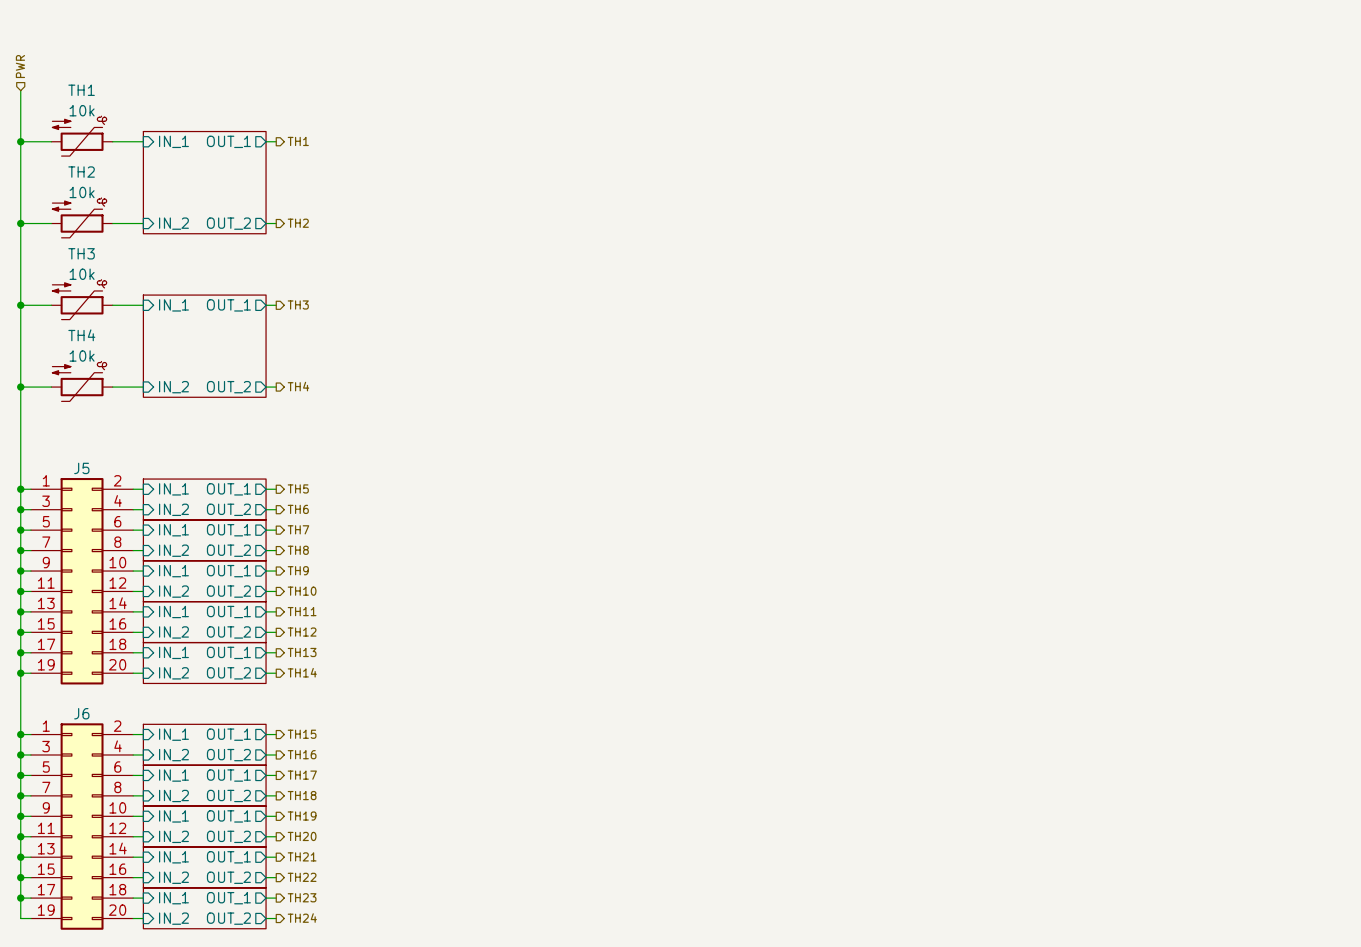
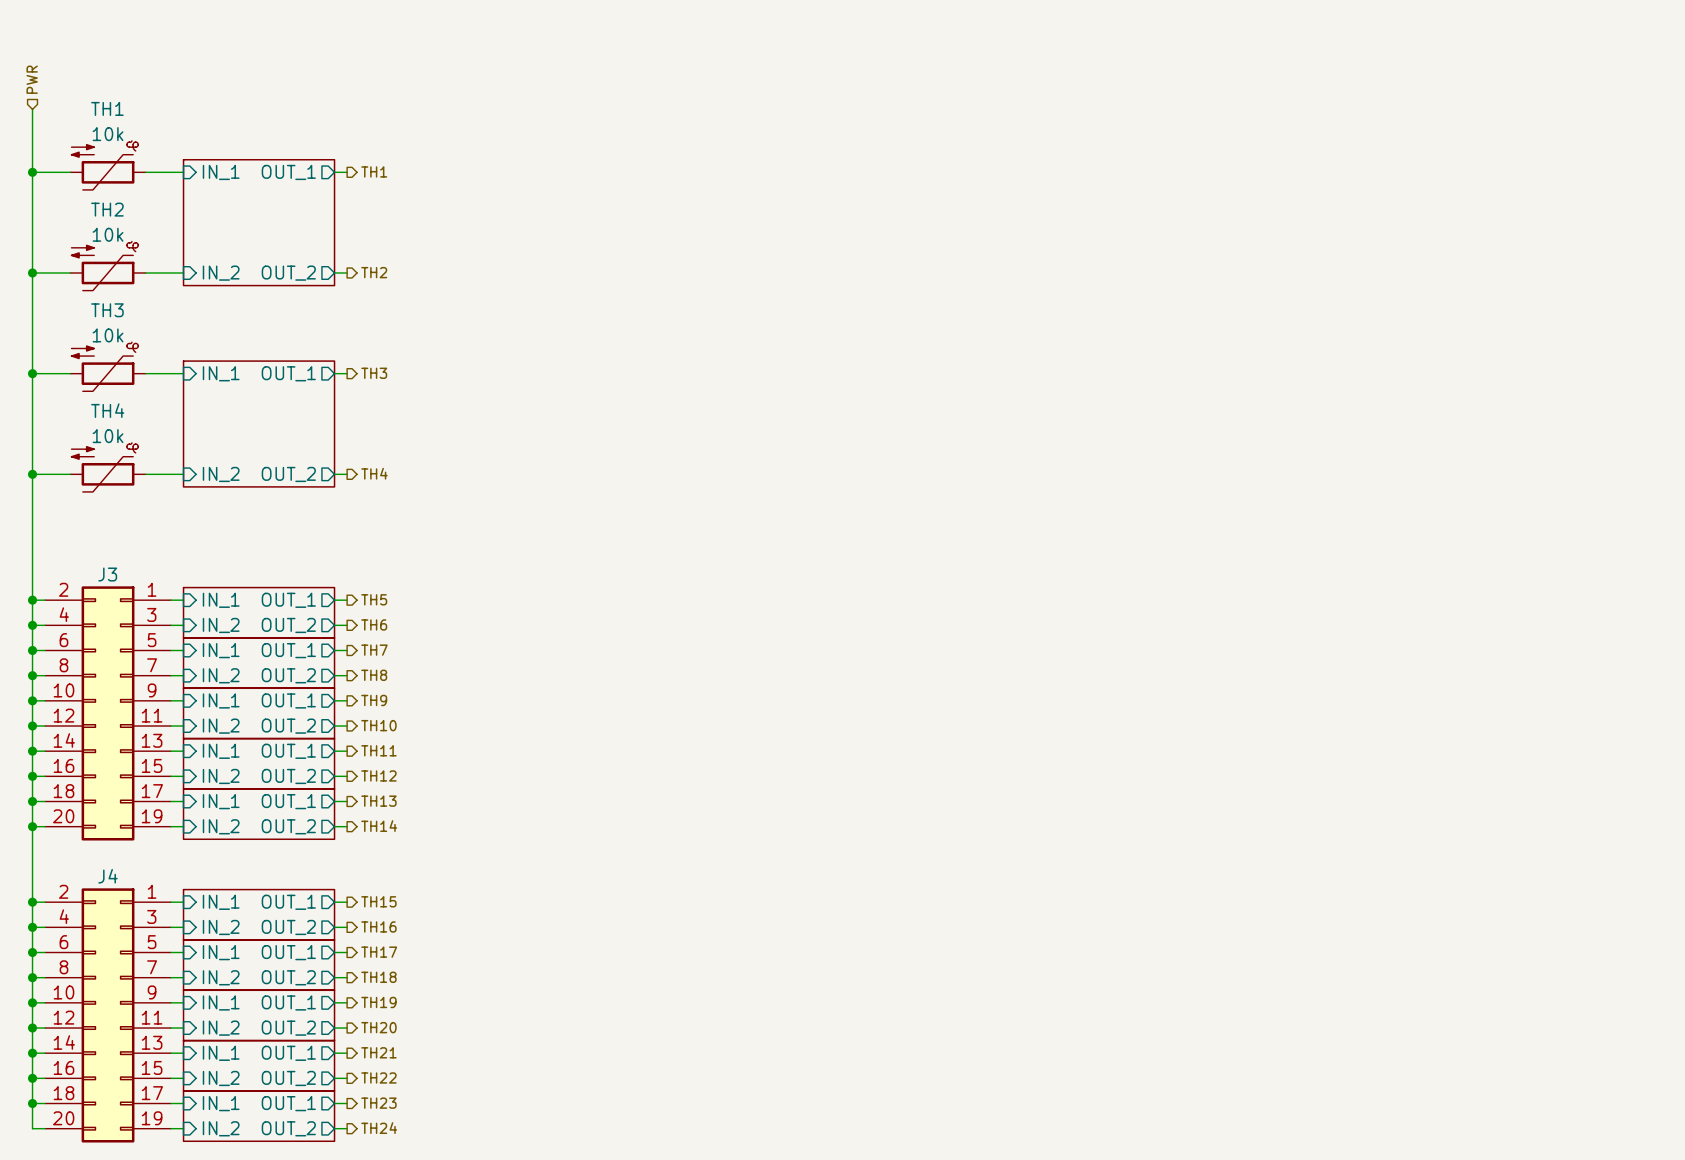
J5 name: J5 (81, 468) -> J3 (107, 574)
J5 flip: as is (82, 581) -> left-right (108, 713)
J6 name: J6 (81, 713) -> J4 (108, 876)
J6 flip: as is (82, 826) -> left-right (108, 1015)

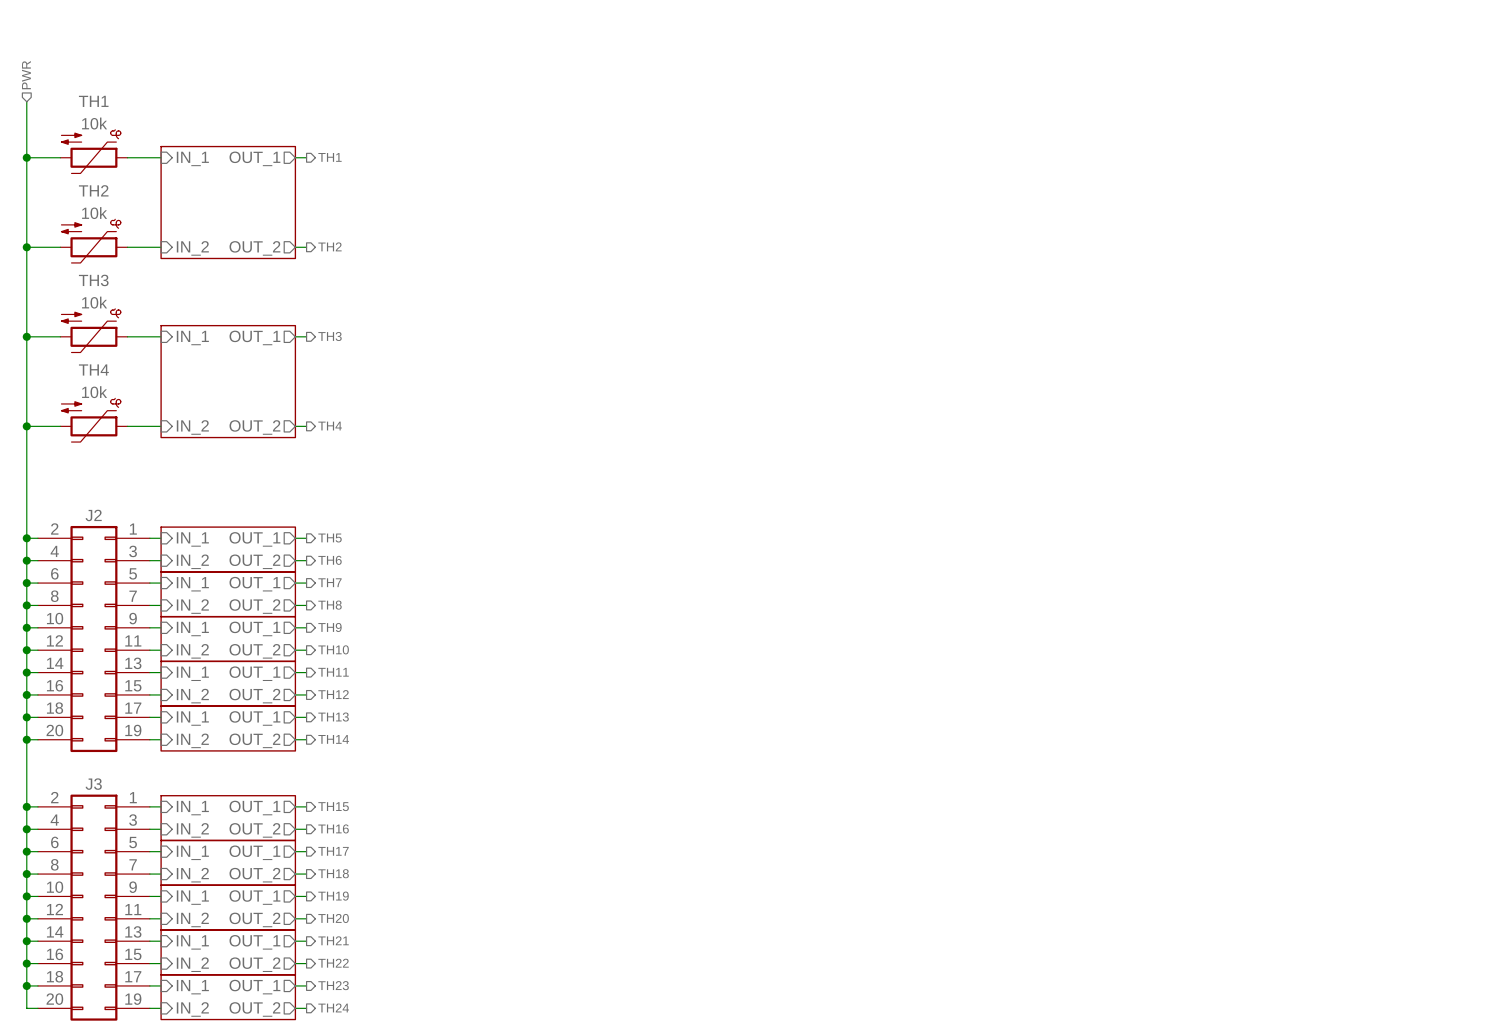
J3 name: J3 (107, 574) -> J2 (93, 515)
J4 name: J4 (108, 876) -> J3 (93, 784)

